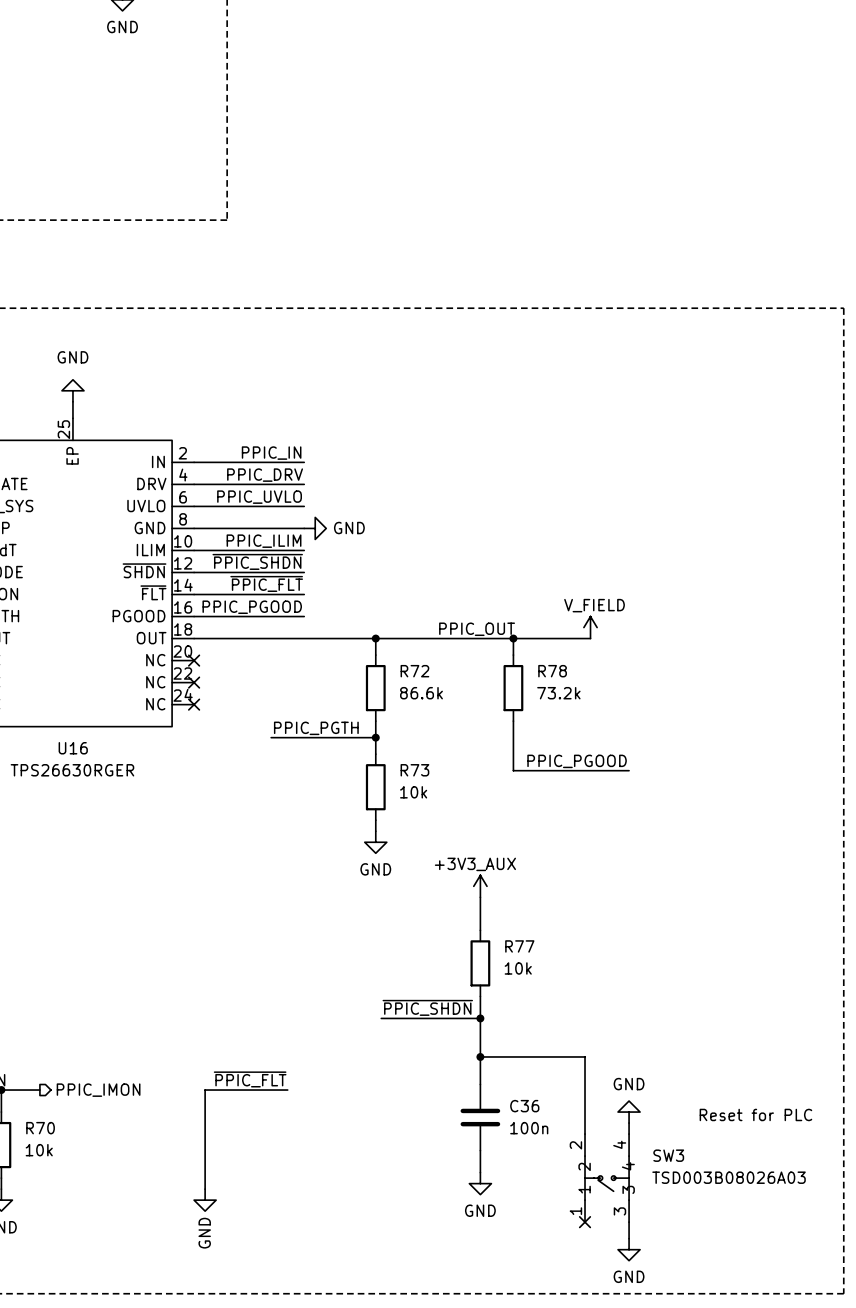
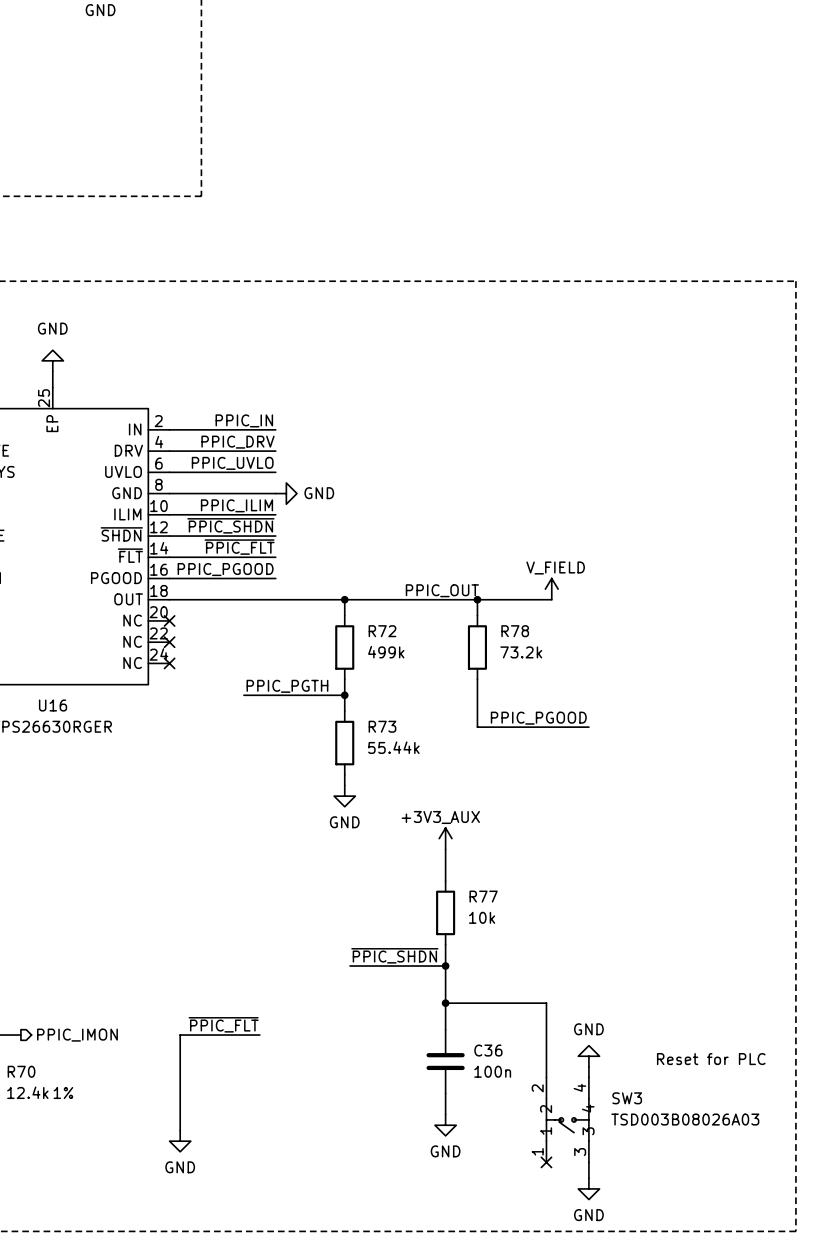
R72 value: 86.6k (421, 693) -> 499k (386, 652)
R73 value: 10k (413, 792) -> 55.44k (393, 747)
R70 value: 10k (39, 1150) -> 12.4k (27, 1092)
R70 text: none -> 1% (63, 1093)
power symbol text rotation: 0° (204, 1233) -> 90° clockwise (180, 1167)

